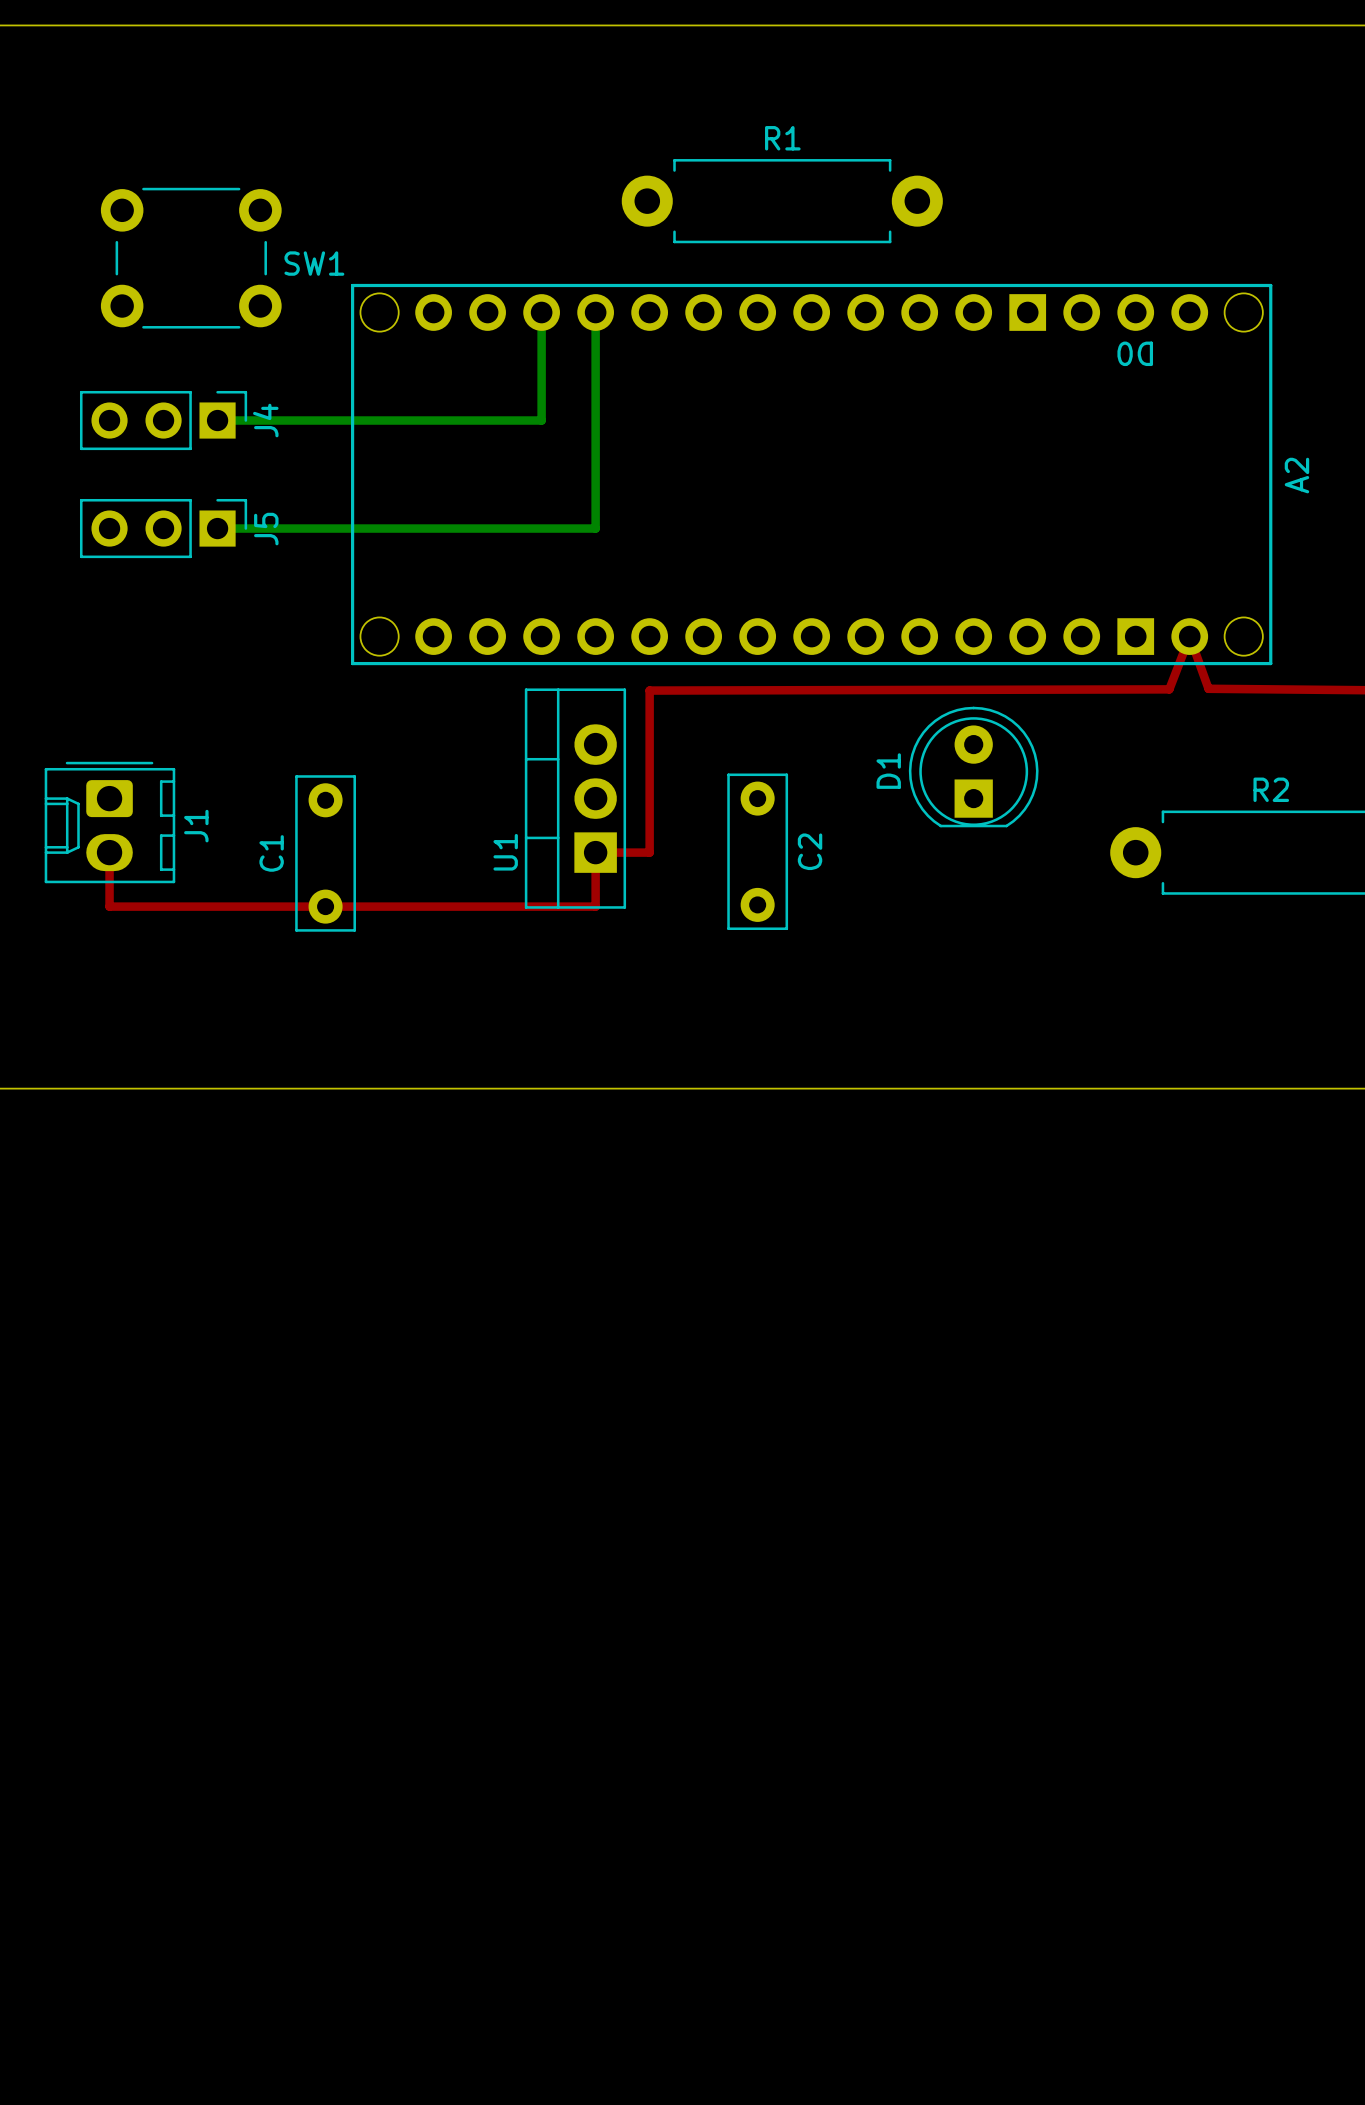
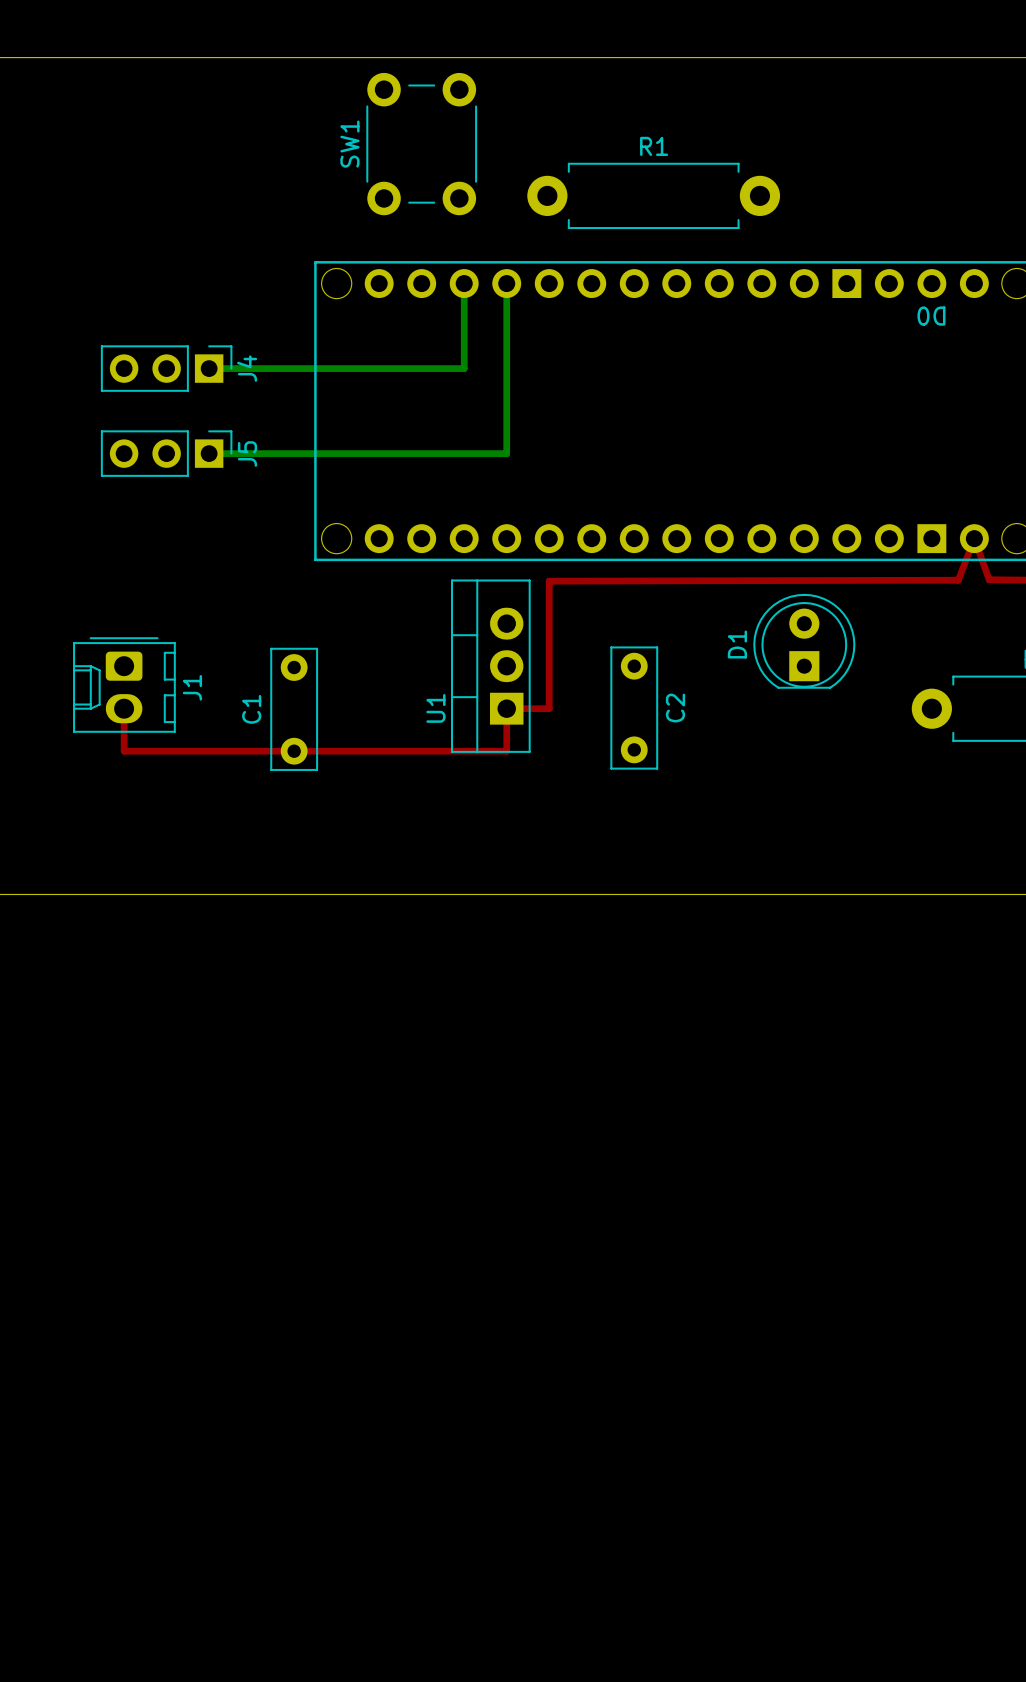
SW1 rotation: 0° (191, 258) -> 90° clockwise (421, 144)
SW1 position: (191, 258) -> (421, 144)
SW1 name position: SW1 (314, 263) -> SW1 (349, 144)

